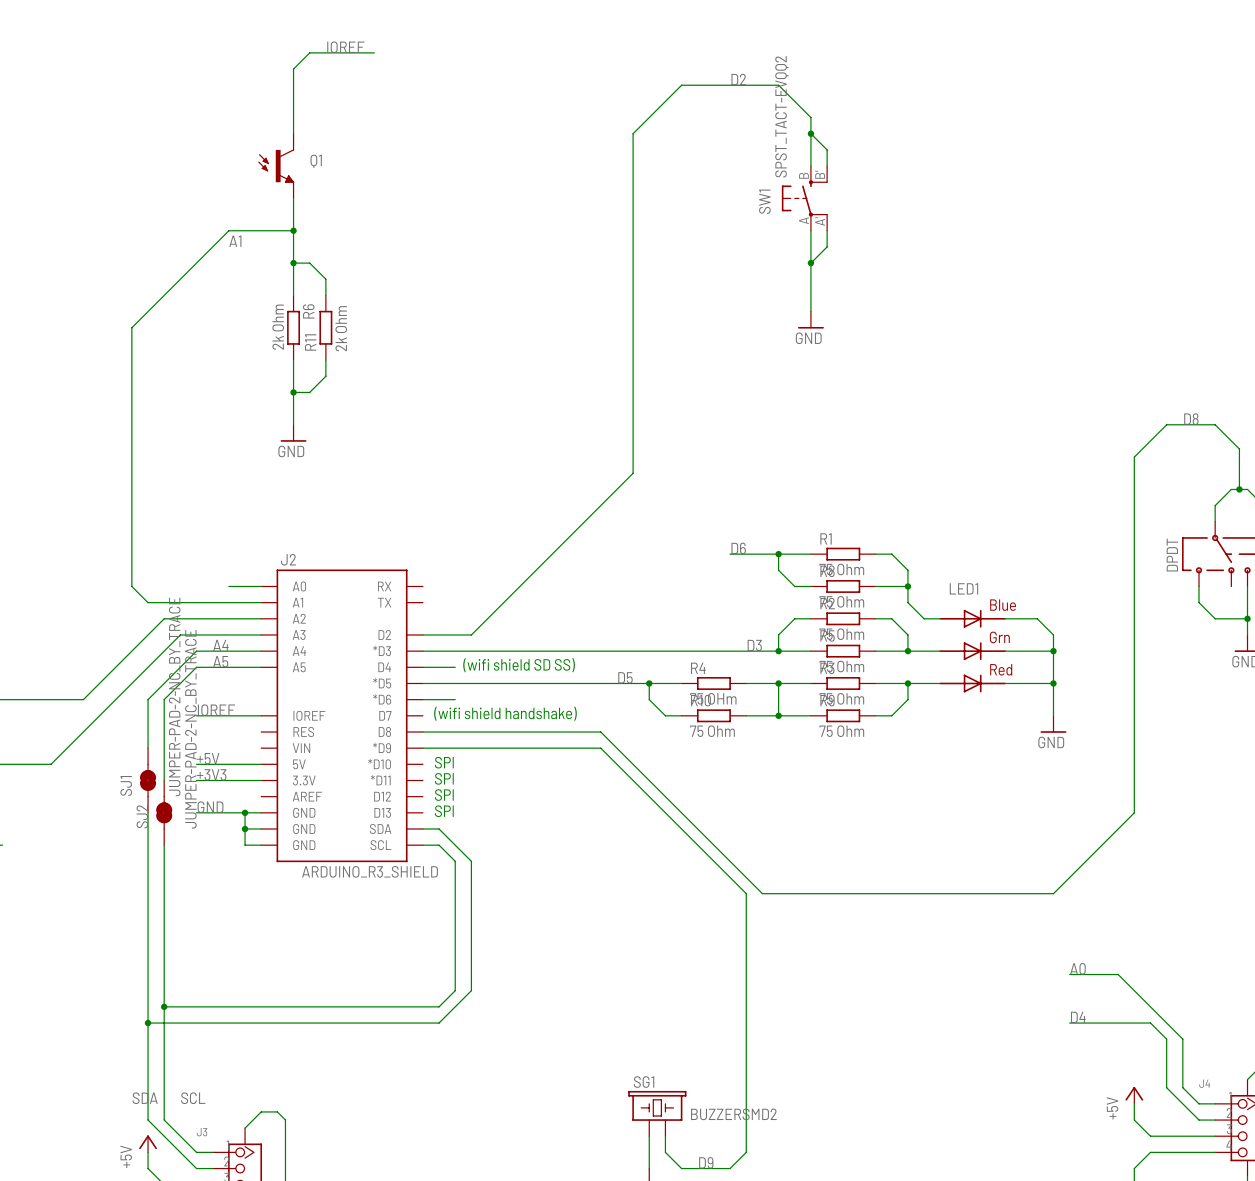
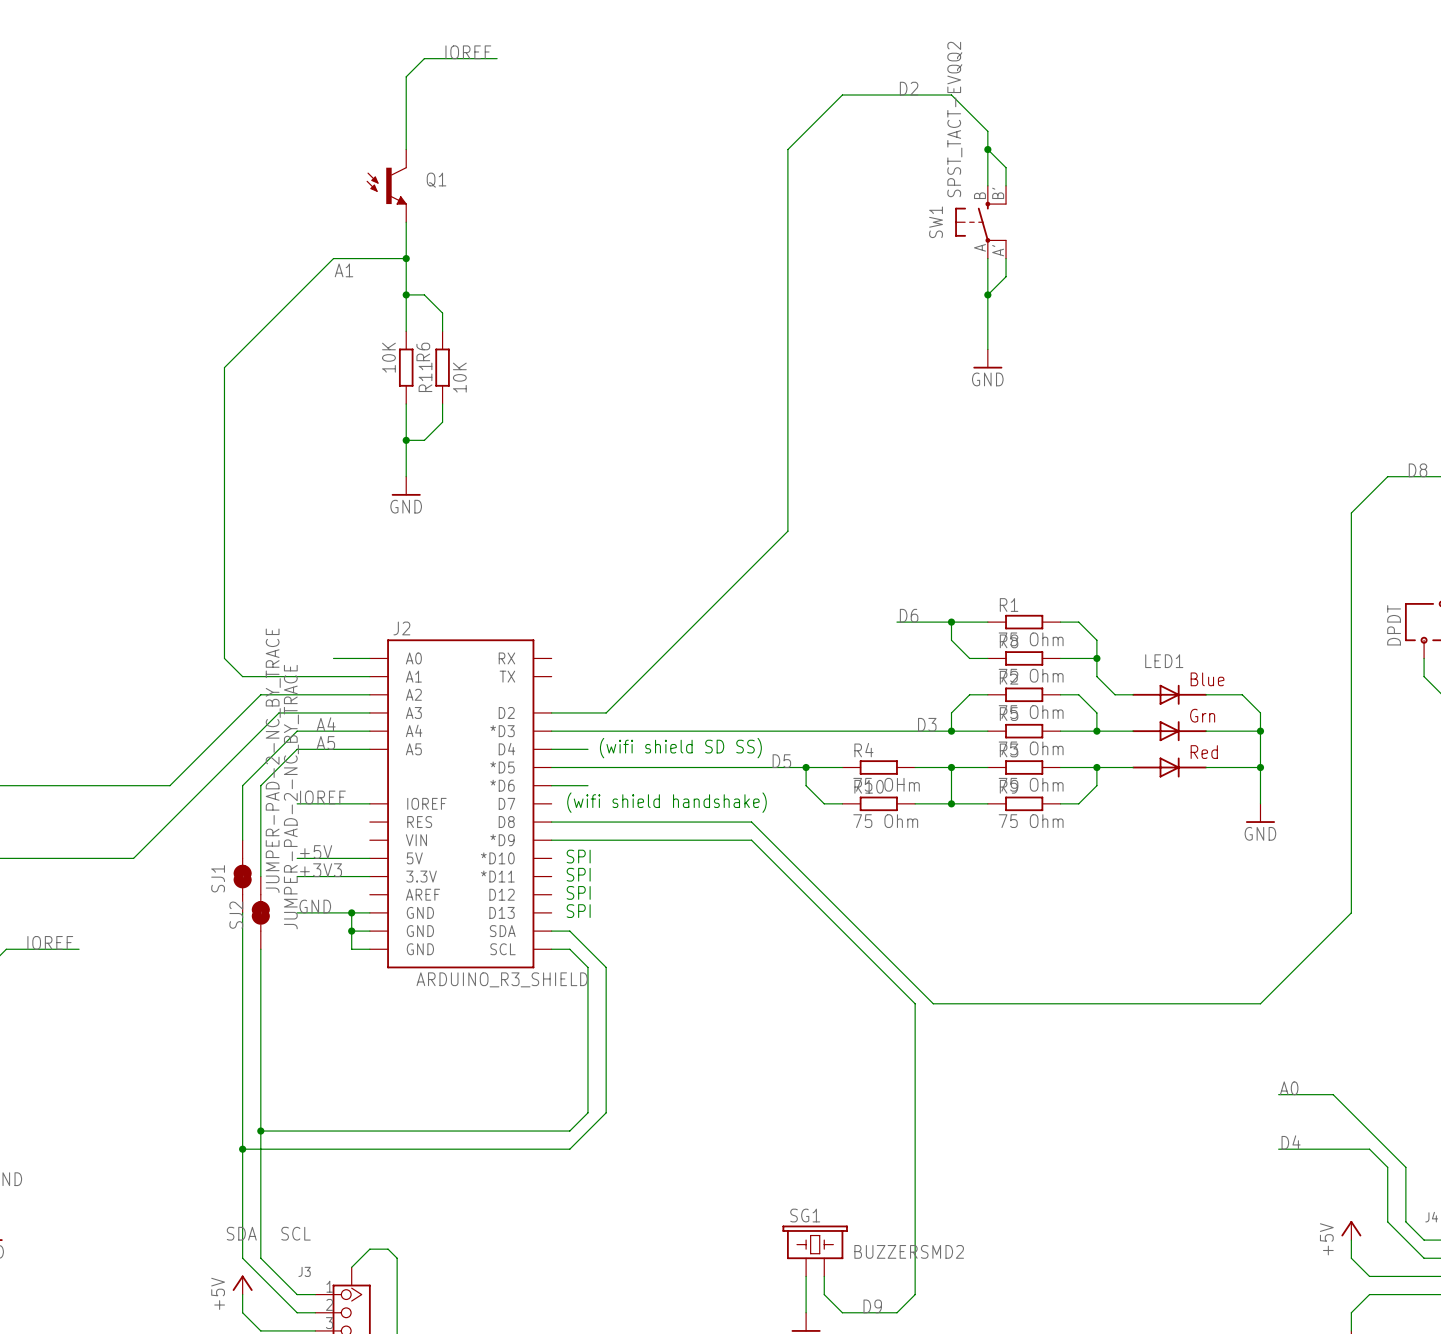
R6 value: 2k Ohm (278, 327) -> 10K (388, 357)
R11 value: 2k Ohm (341, 328) -> 10K (459, 377)

